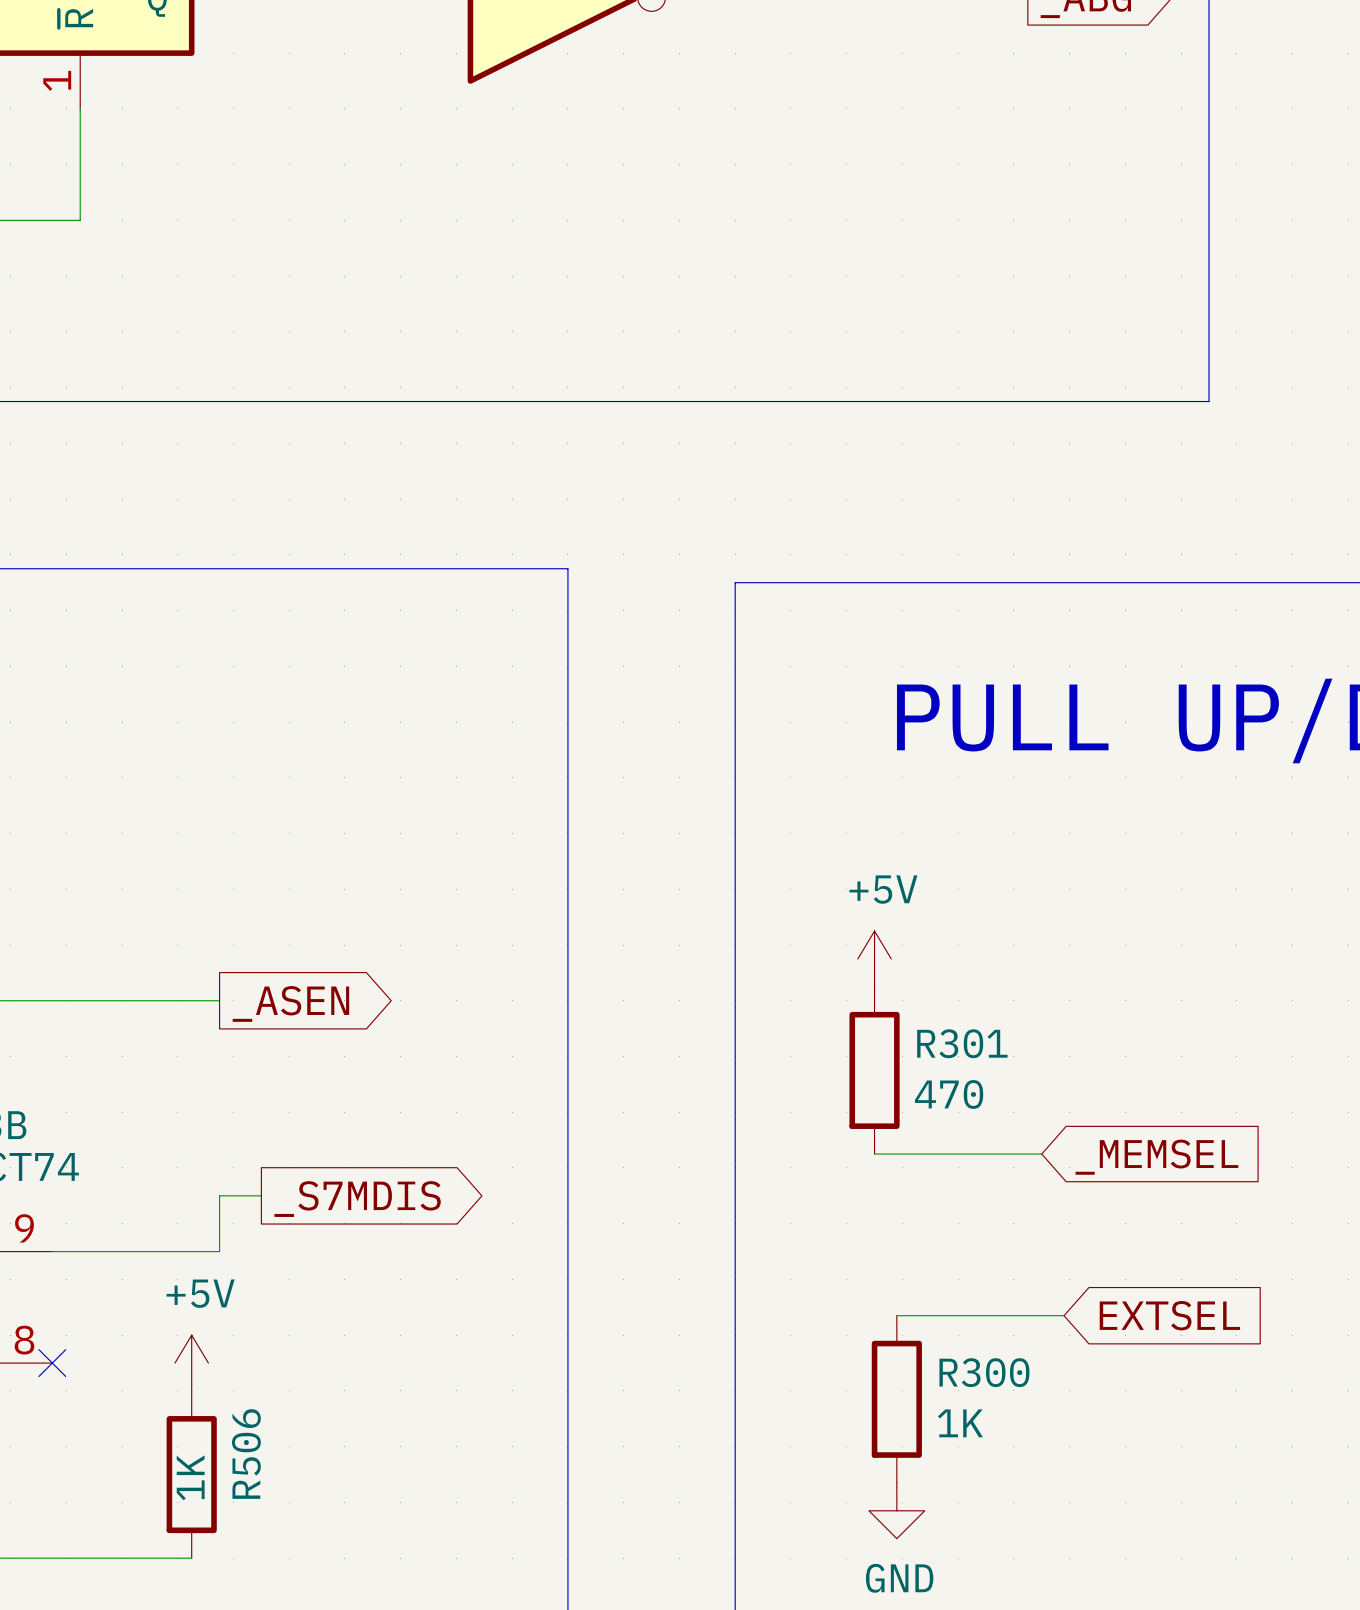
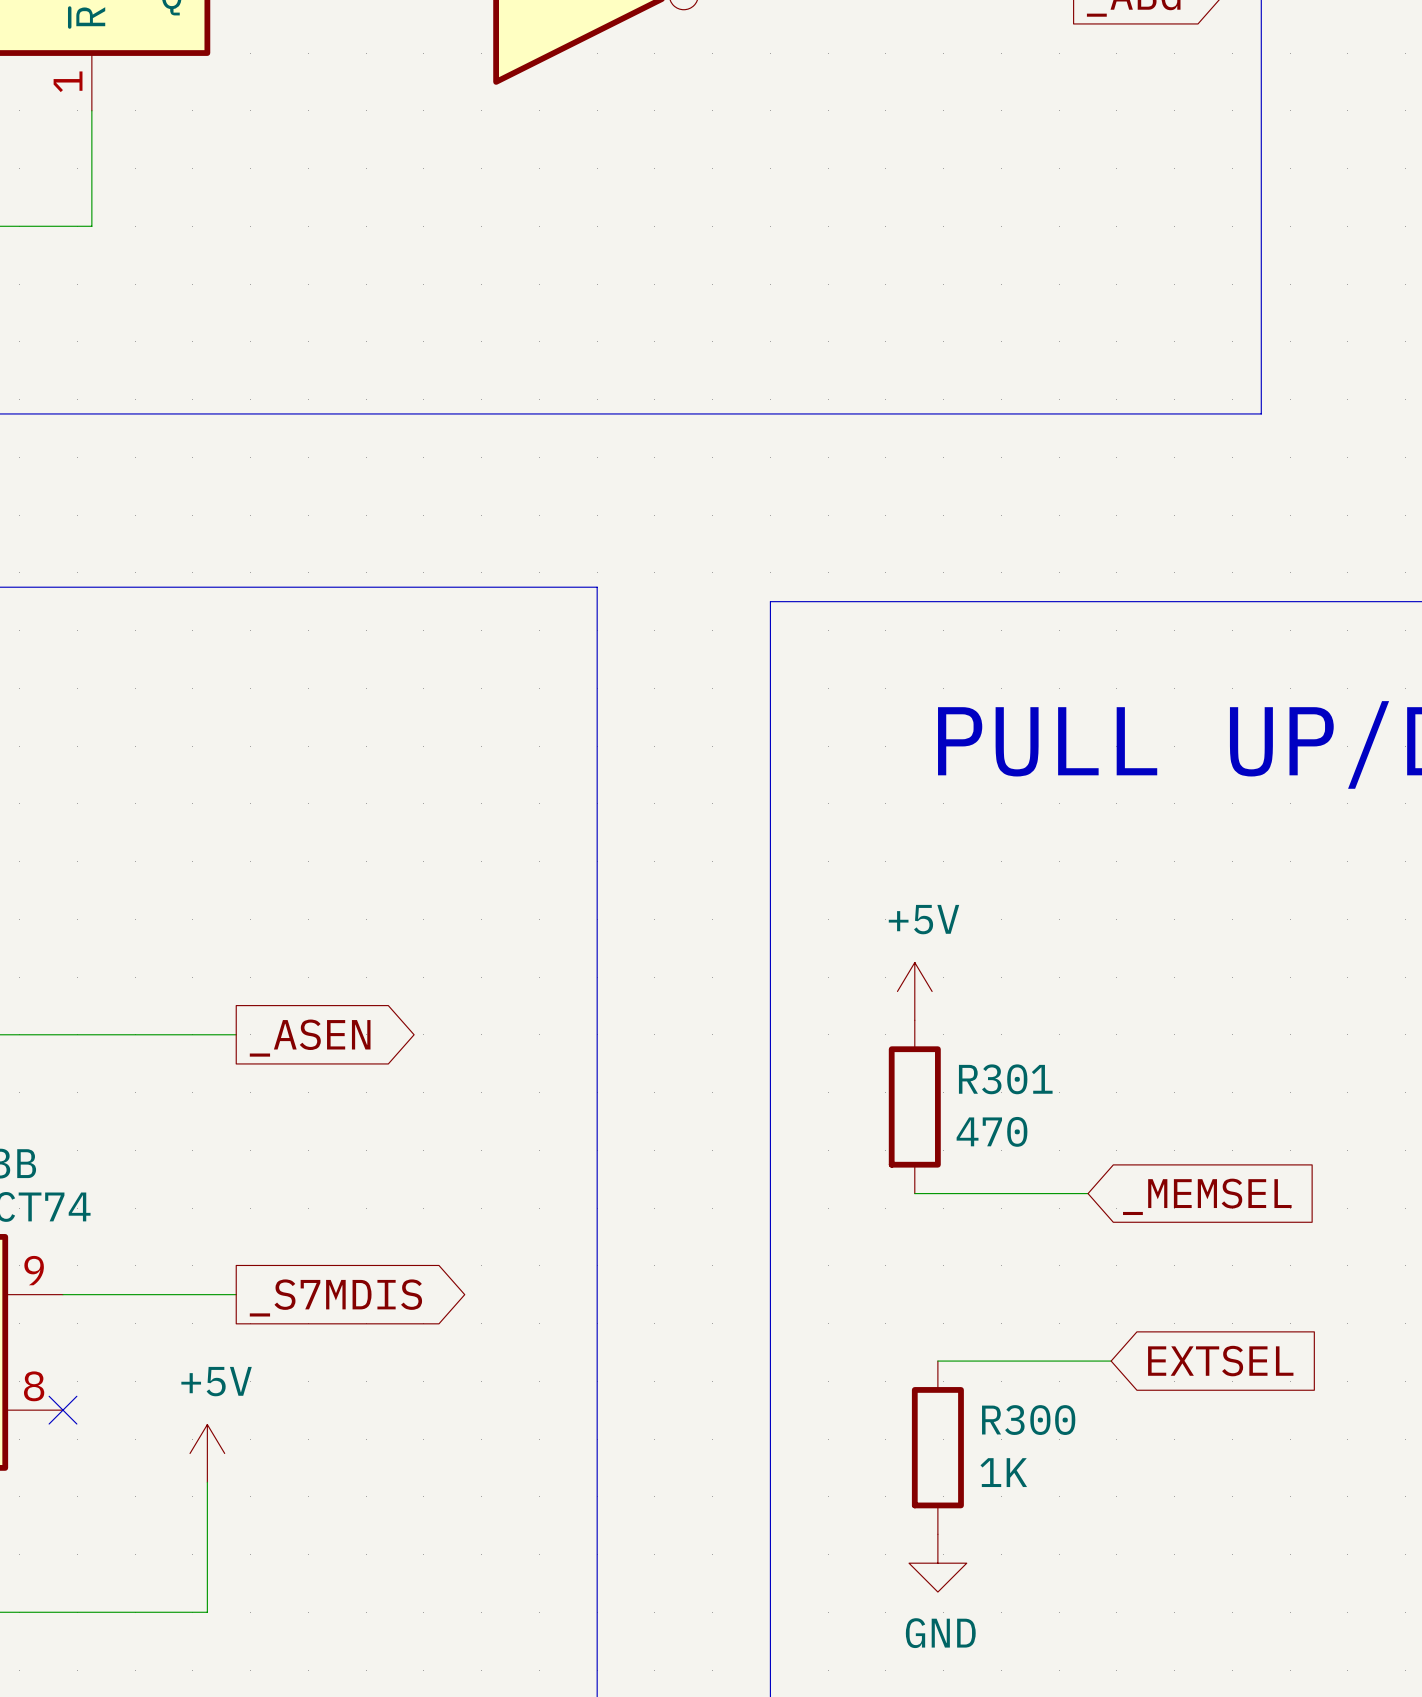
wire: (261, 1195) (219, 1195) (219, 1251) -> none
global label position: _S7MDIS (357, 1199) -> _S7MDIS (335, 1297)
power symbol position: +5V (191, 1363) -> +5V (207, 1453)
wire: none -> (207, 1482) (207, 1612)
R506: 1K (191, 1474) -> none

